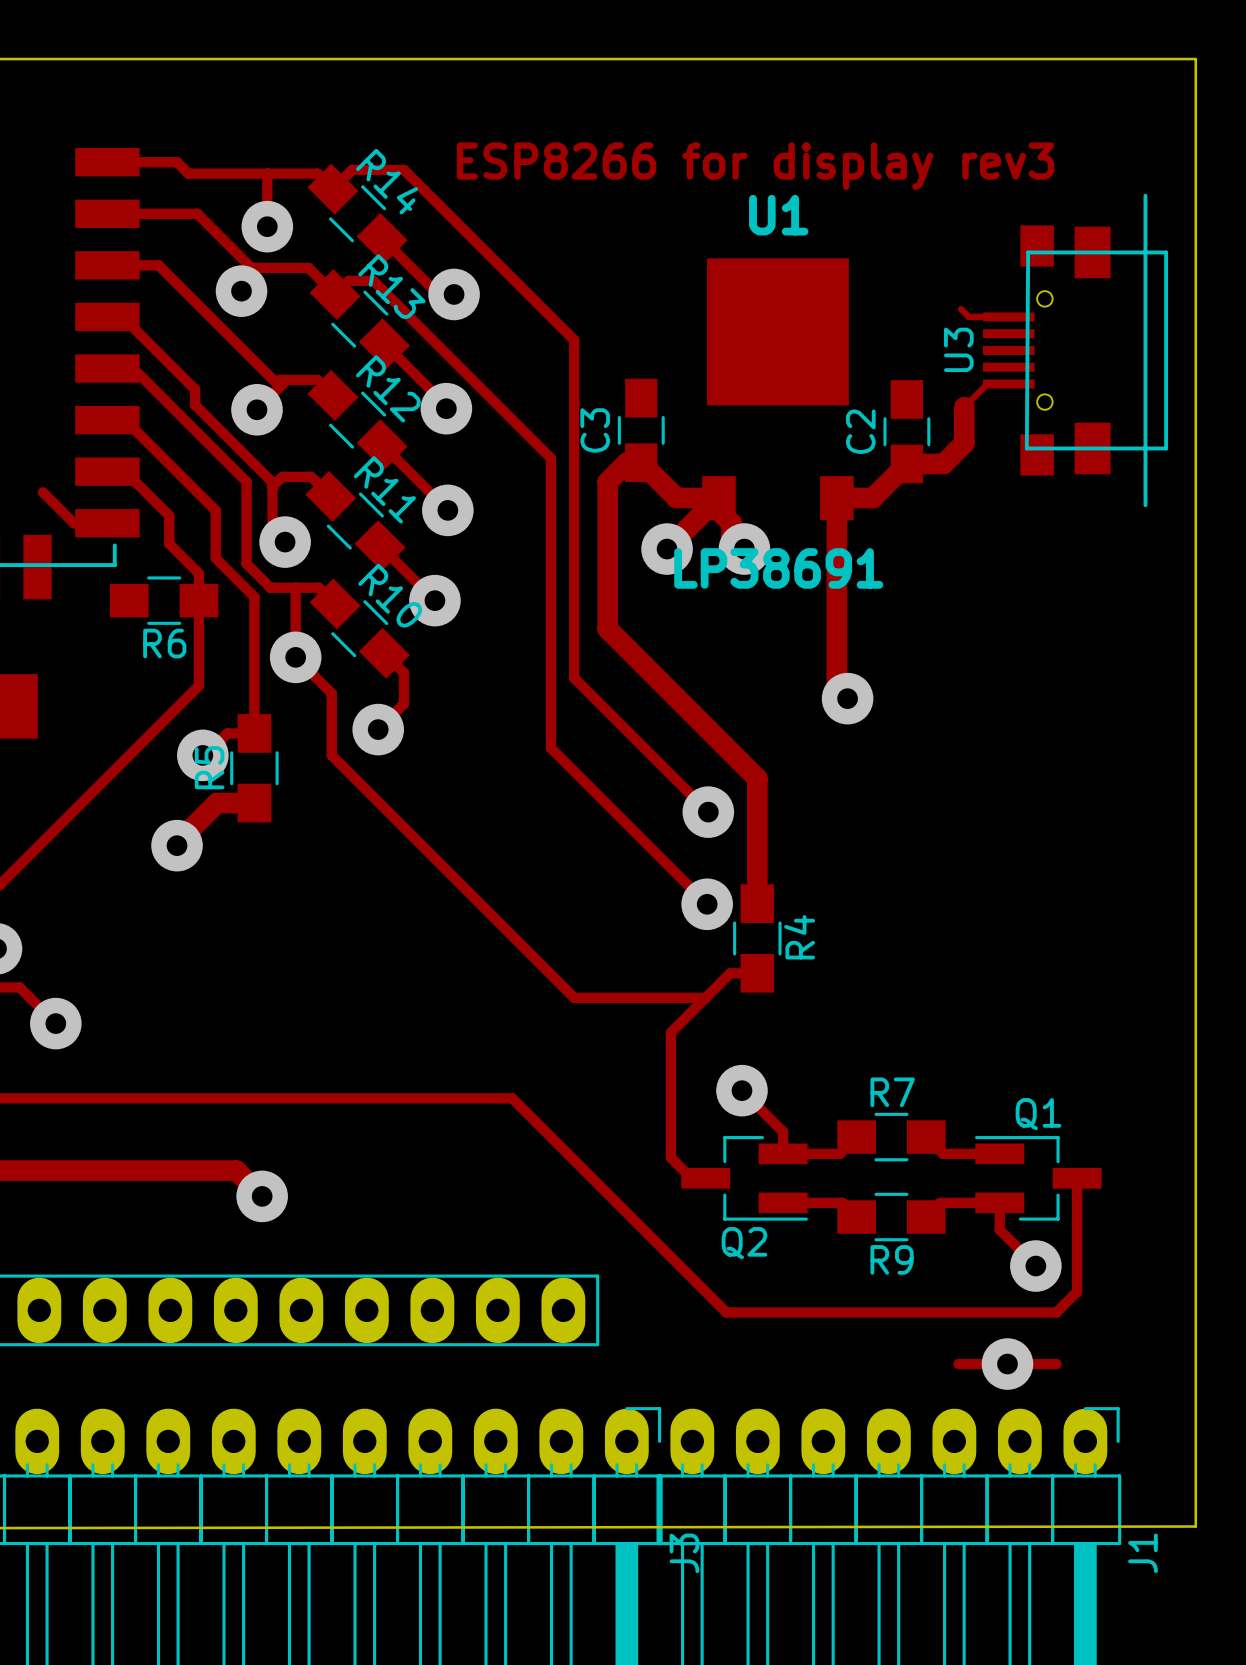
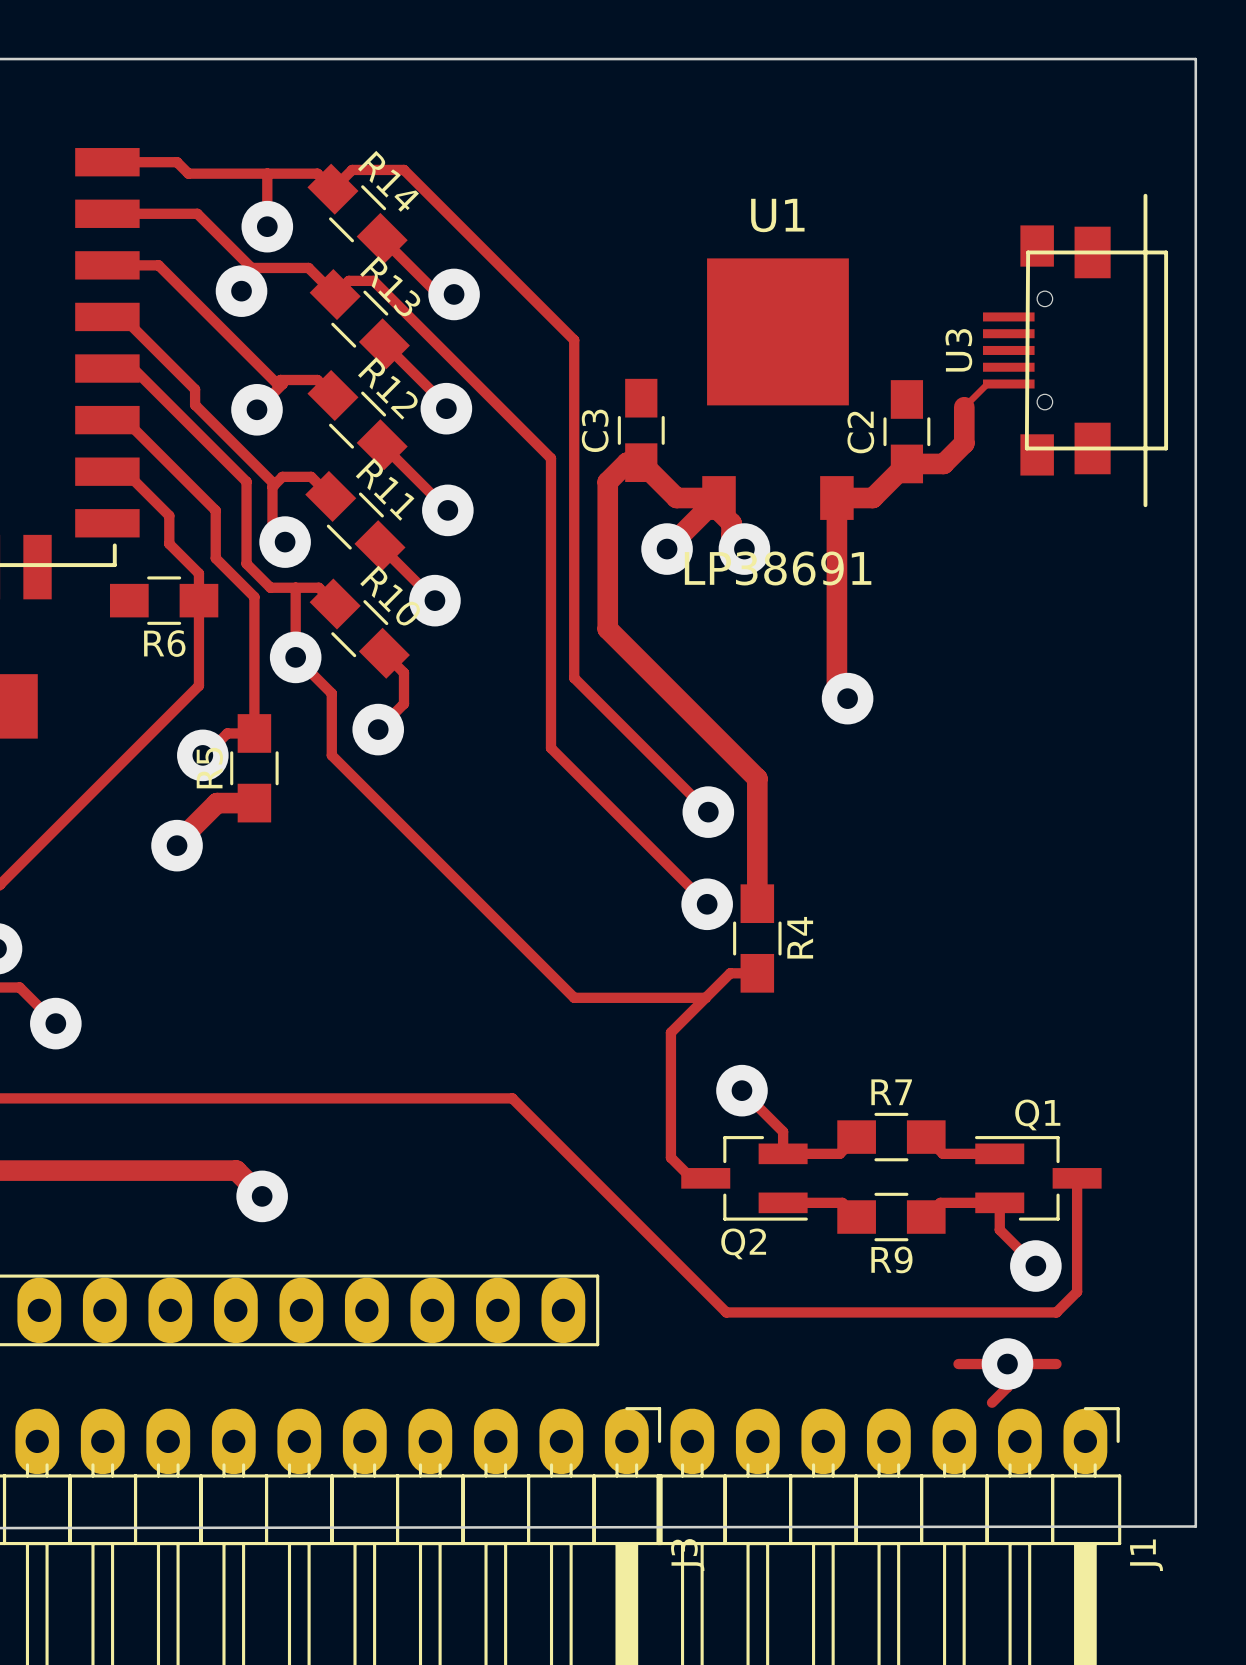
text: ESP8266 for display rev3 (755, 166) -> none
track: (961, 309) (968, 316) (1008, 316) -> none
track: (42, 492) (73, 523) (89, 523) -> none
track: none -> (1007, 1364) (1007, 1387) (992, 1402)

